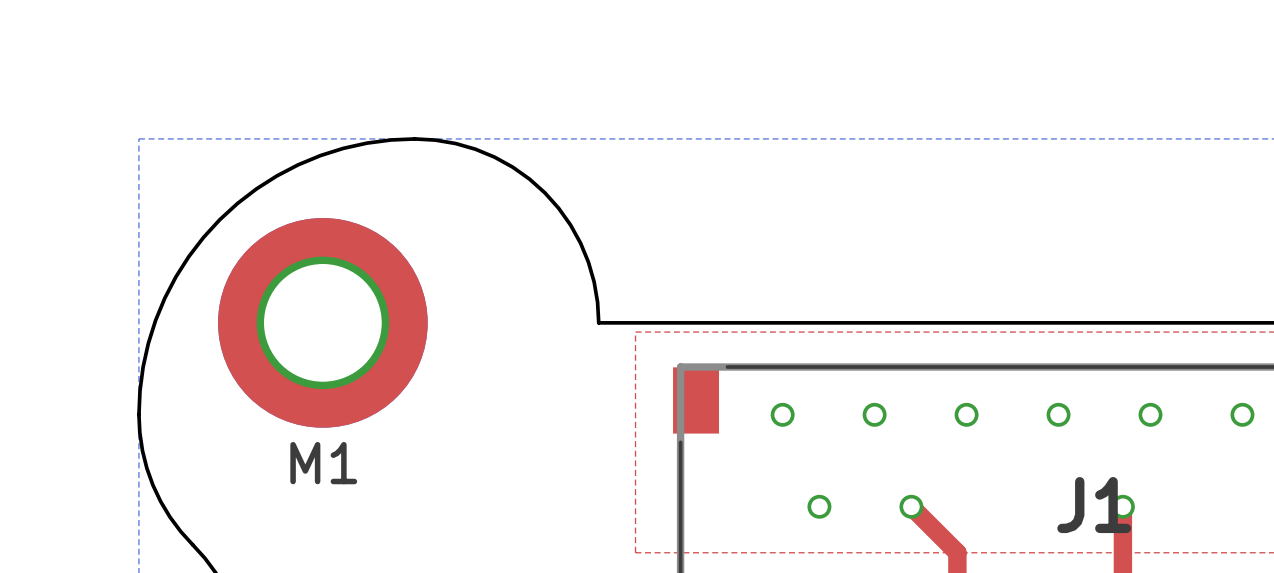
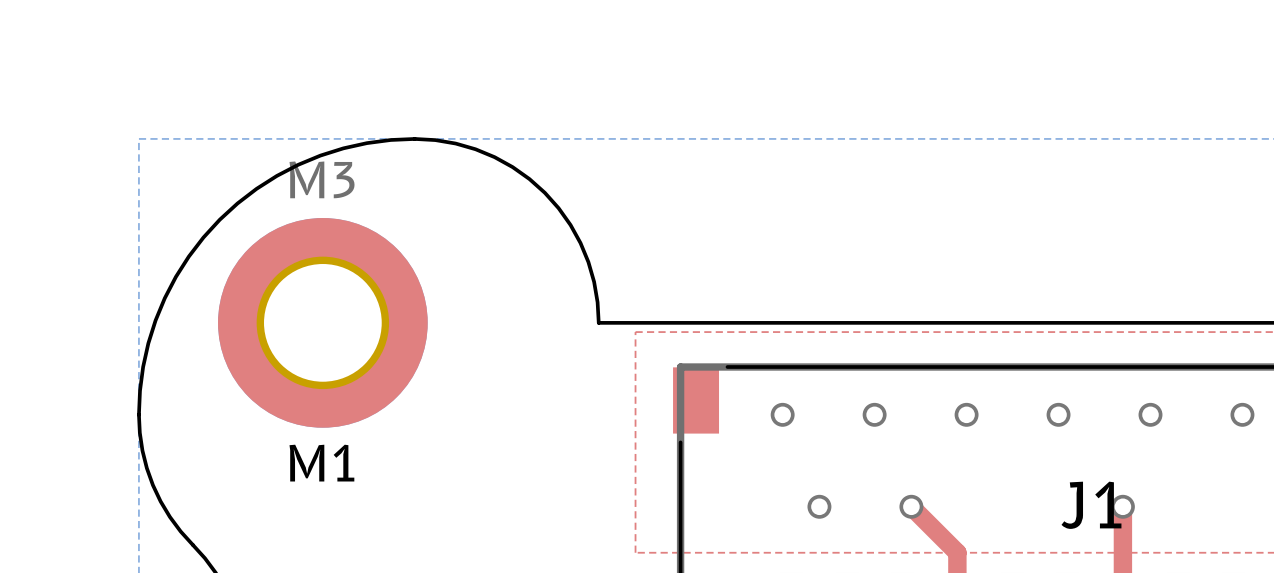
M1 value: none -> M3 (322, 179)

